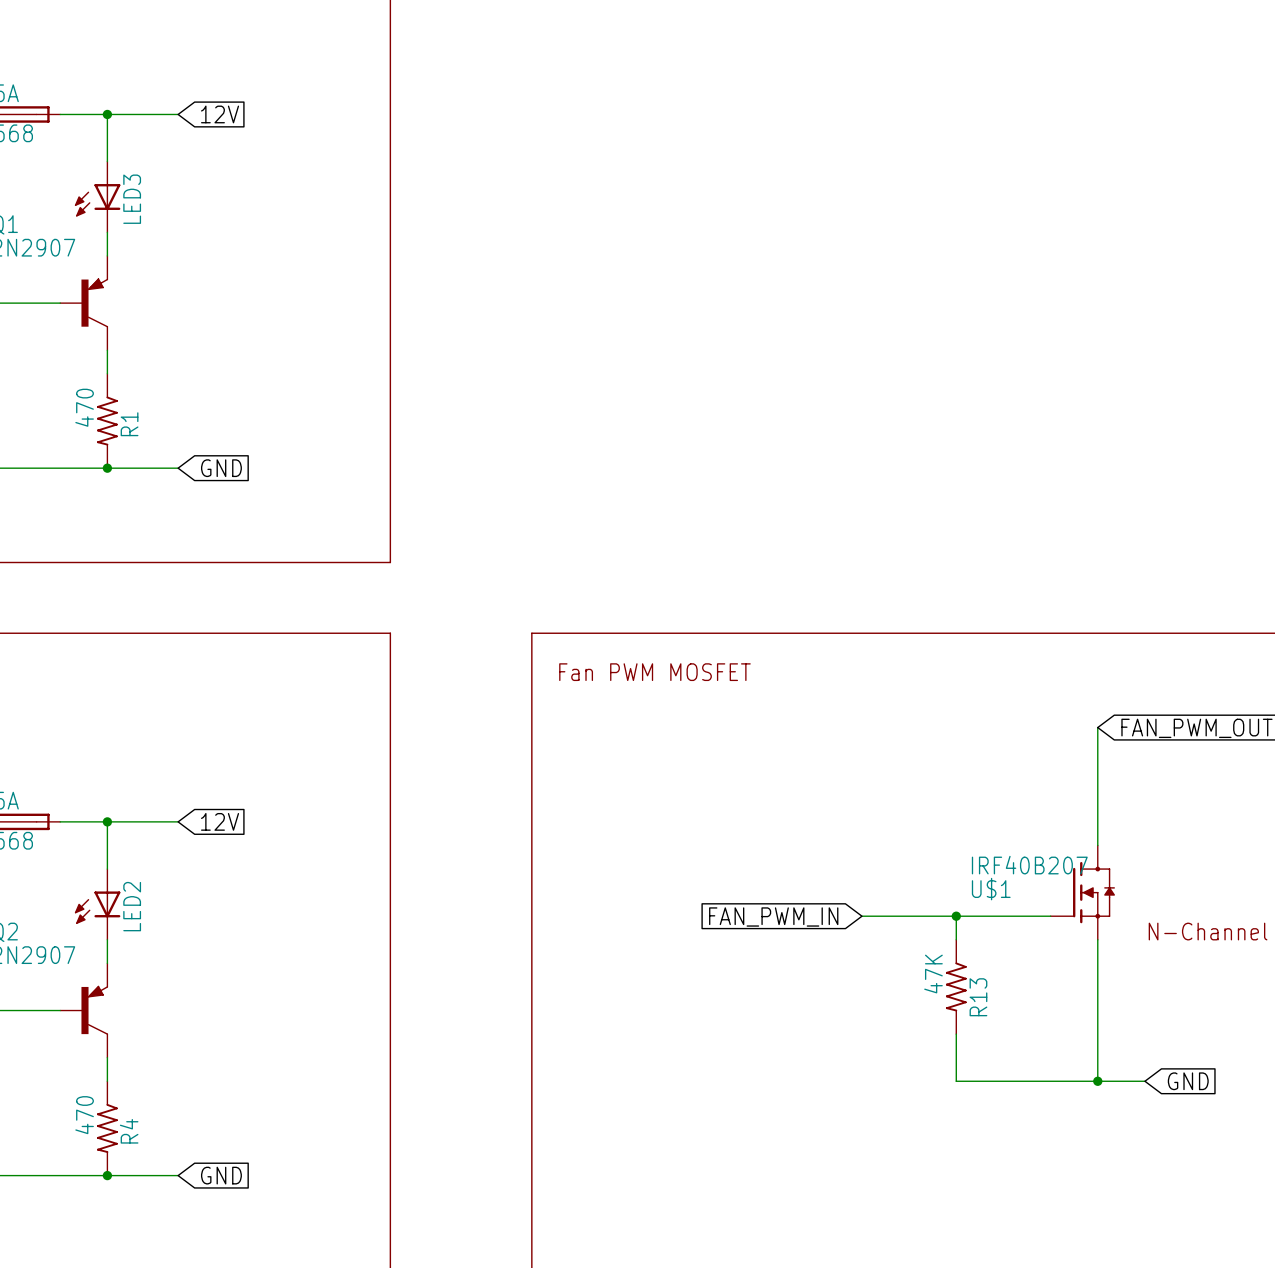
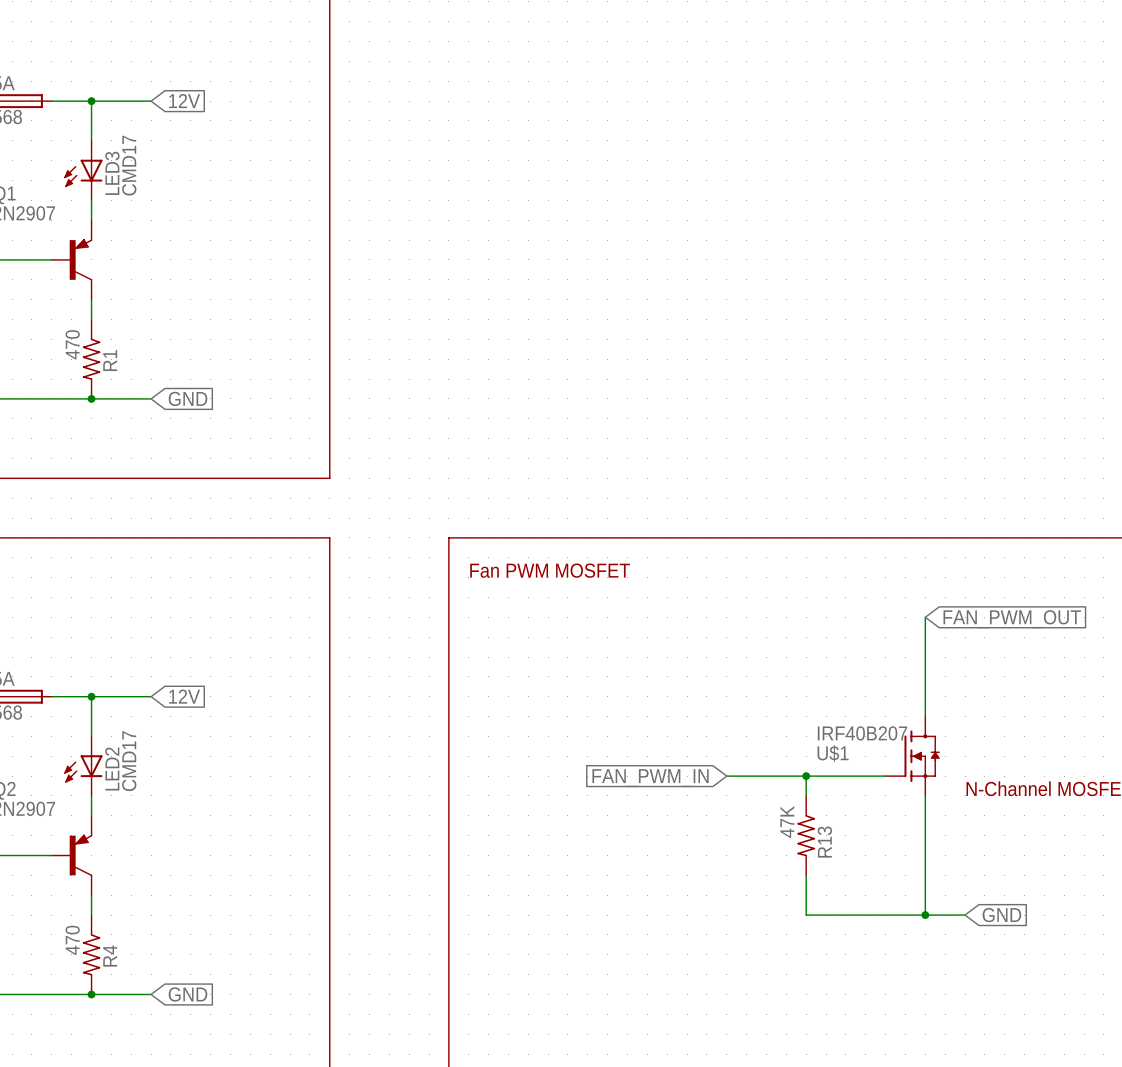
LED3 value: none -> CMD17 (129, 165)
LED2 value: none -> CMD17 (129, 761)

